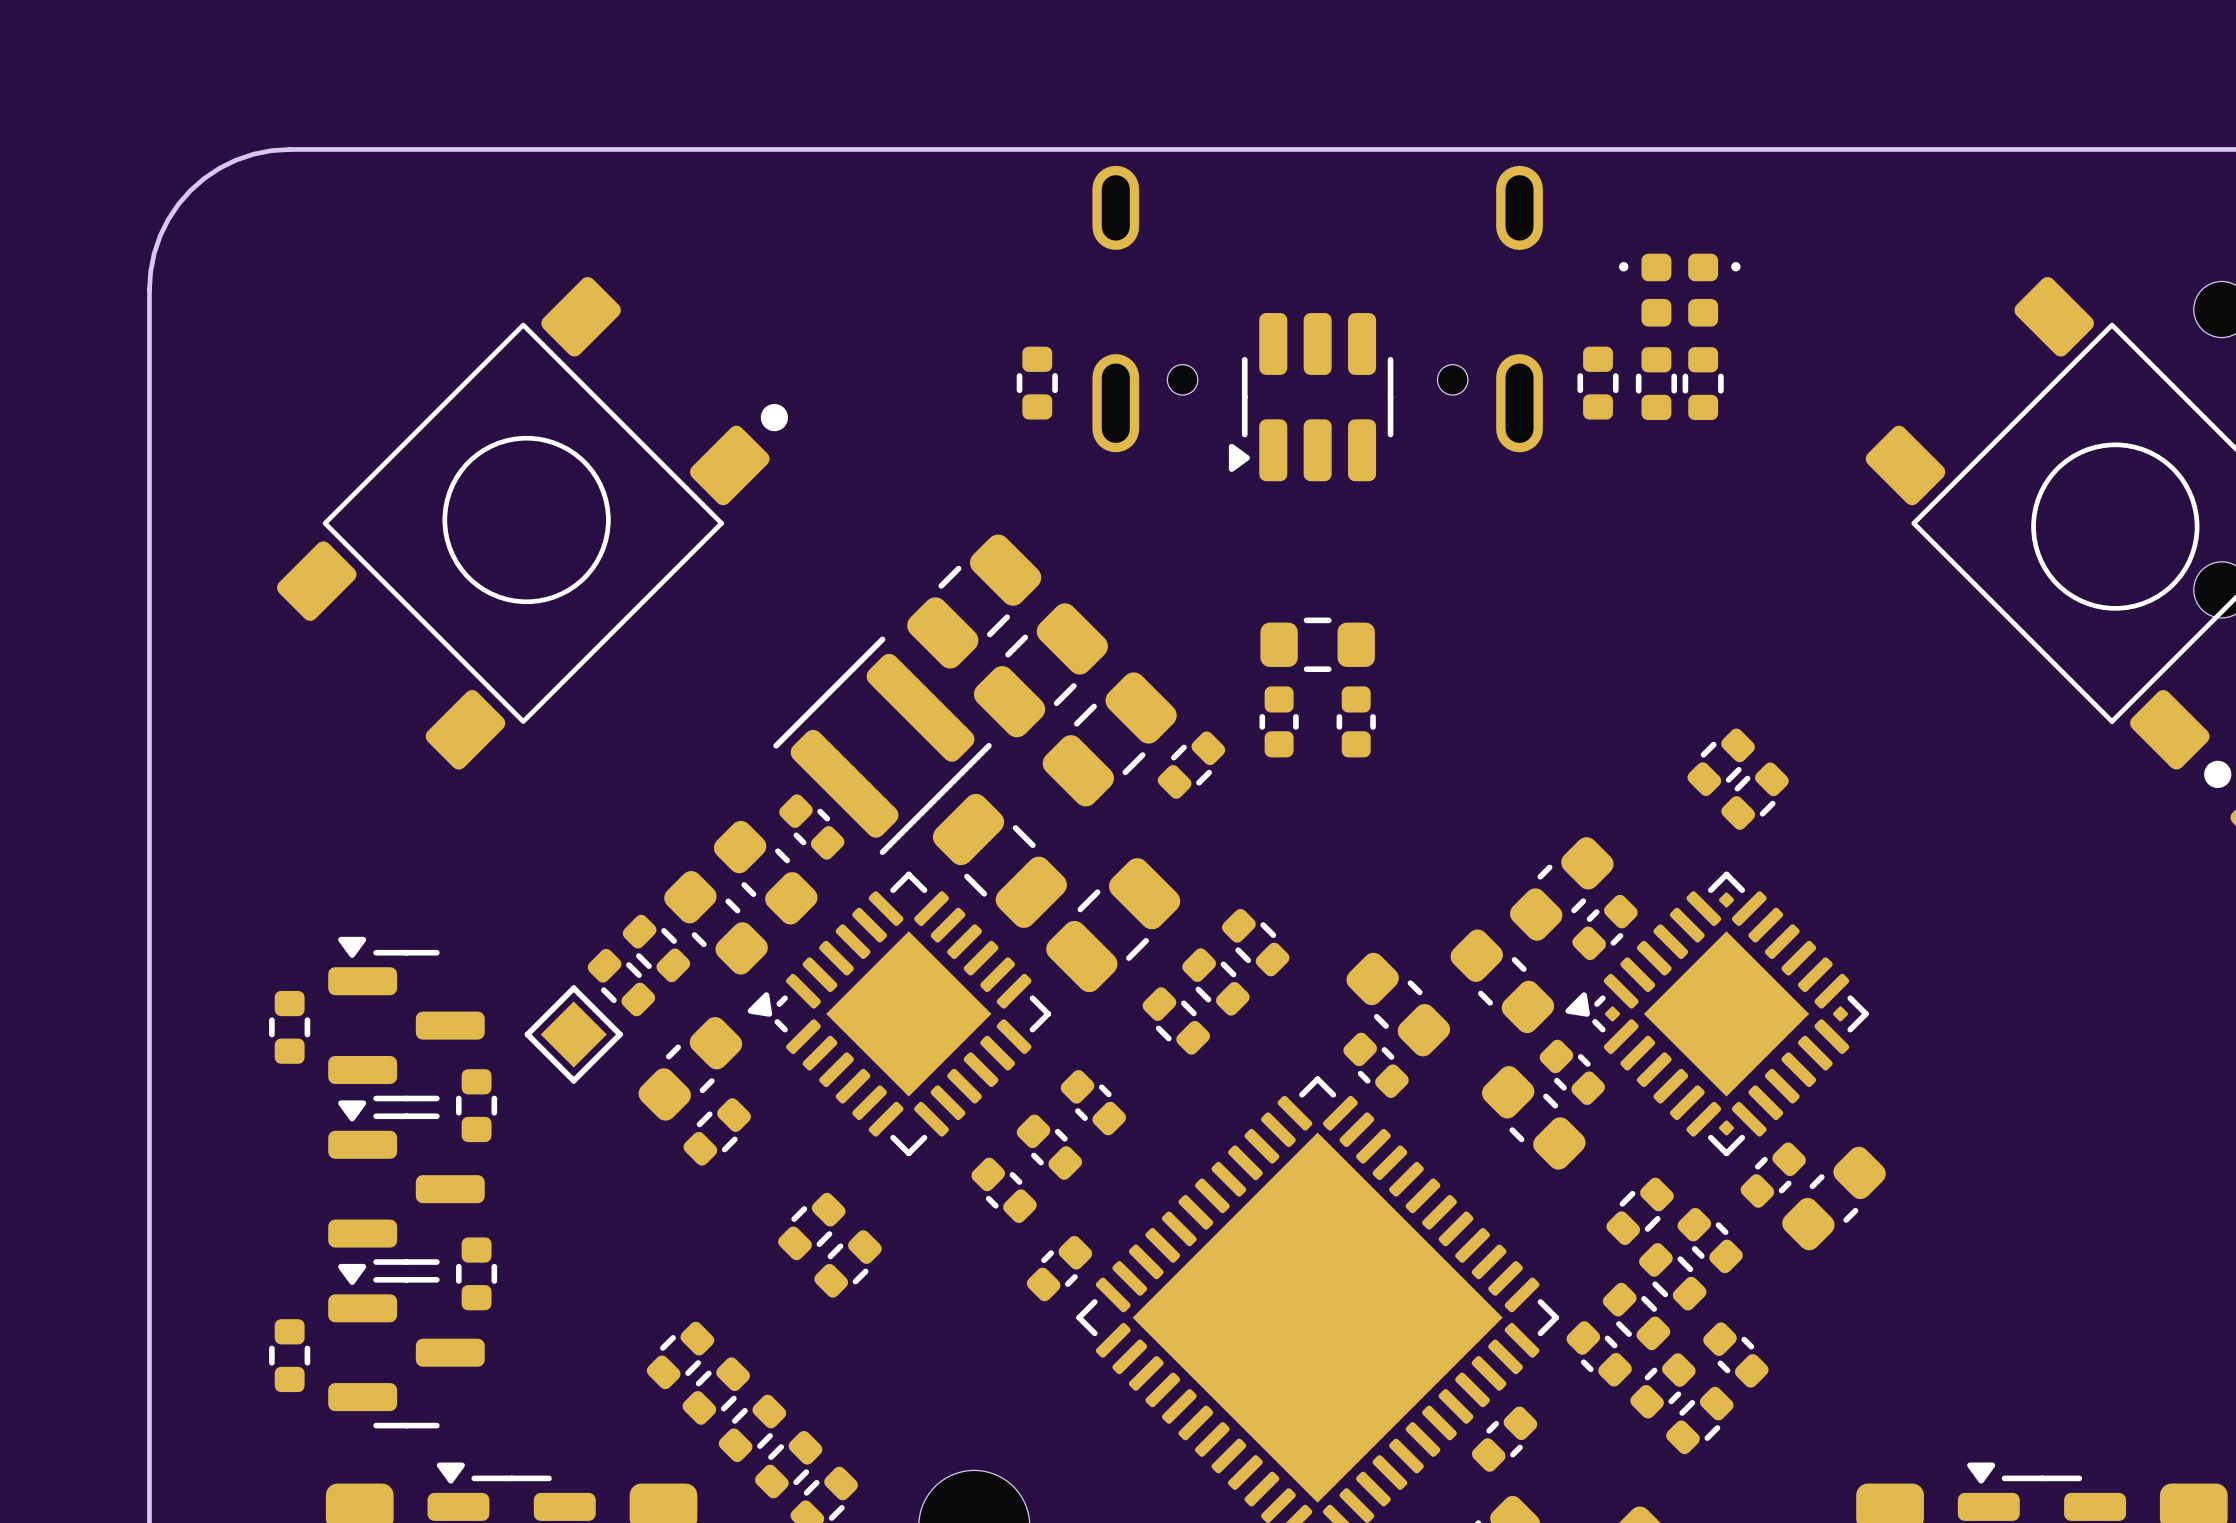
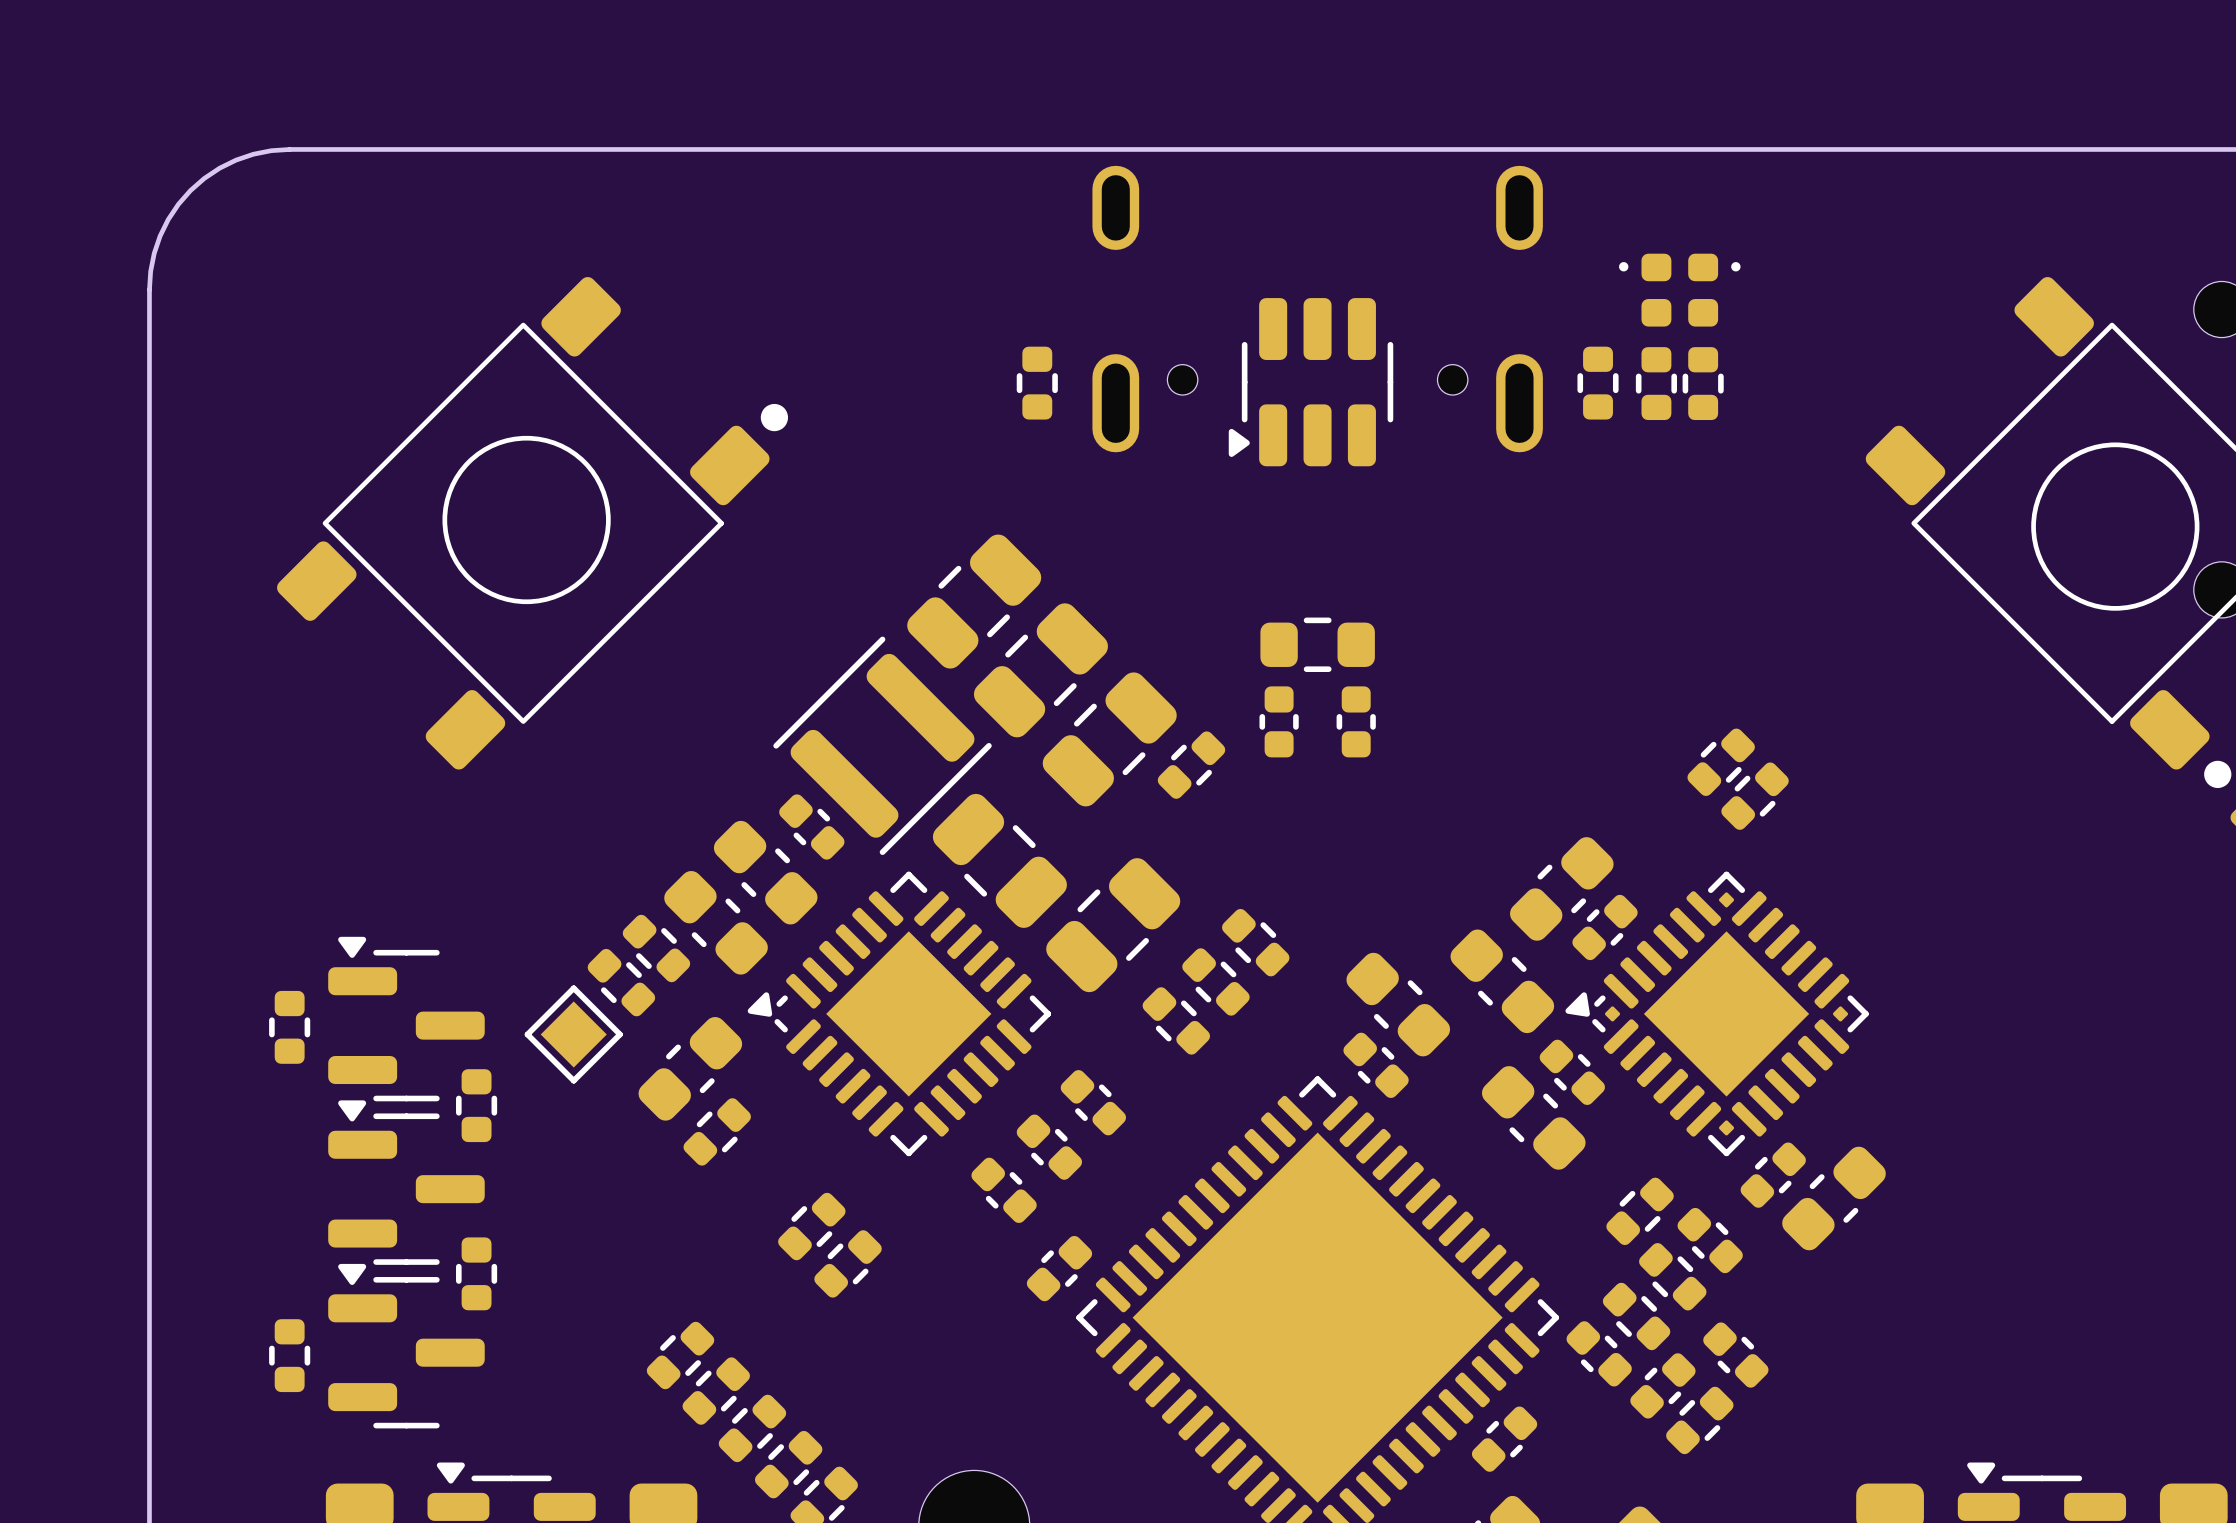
part position: (1311, 397) -> (1311, 382)

